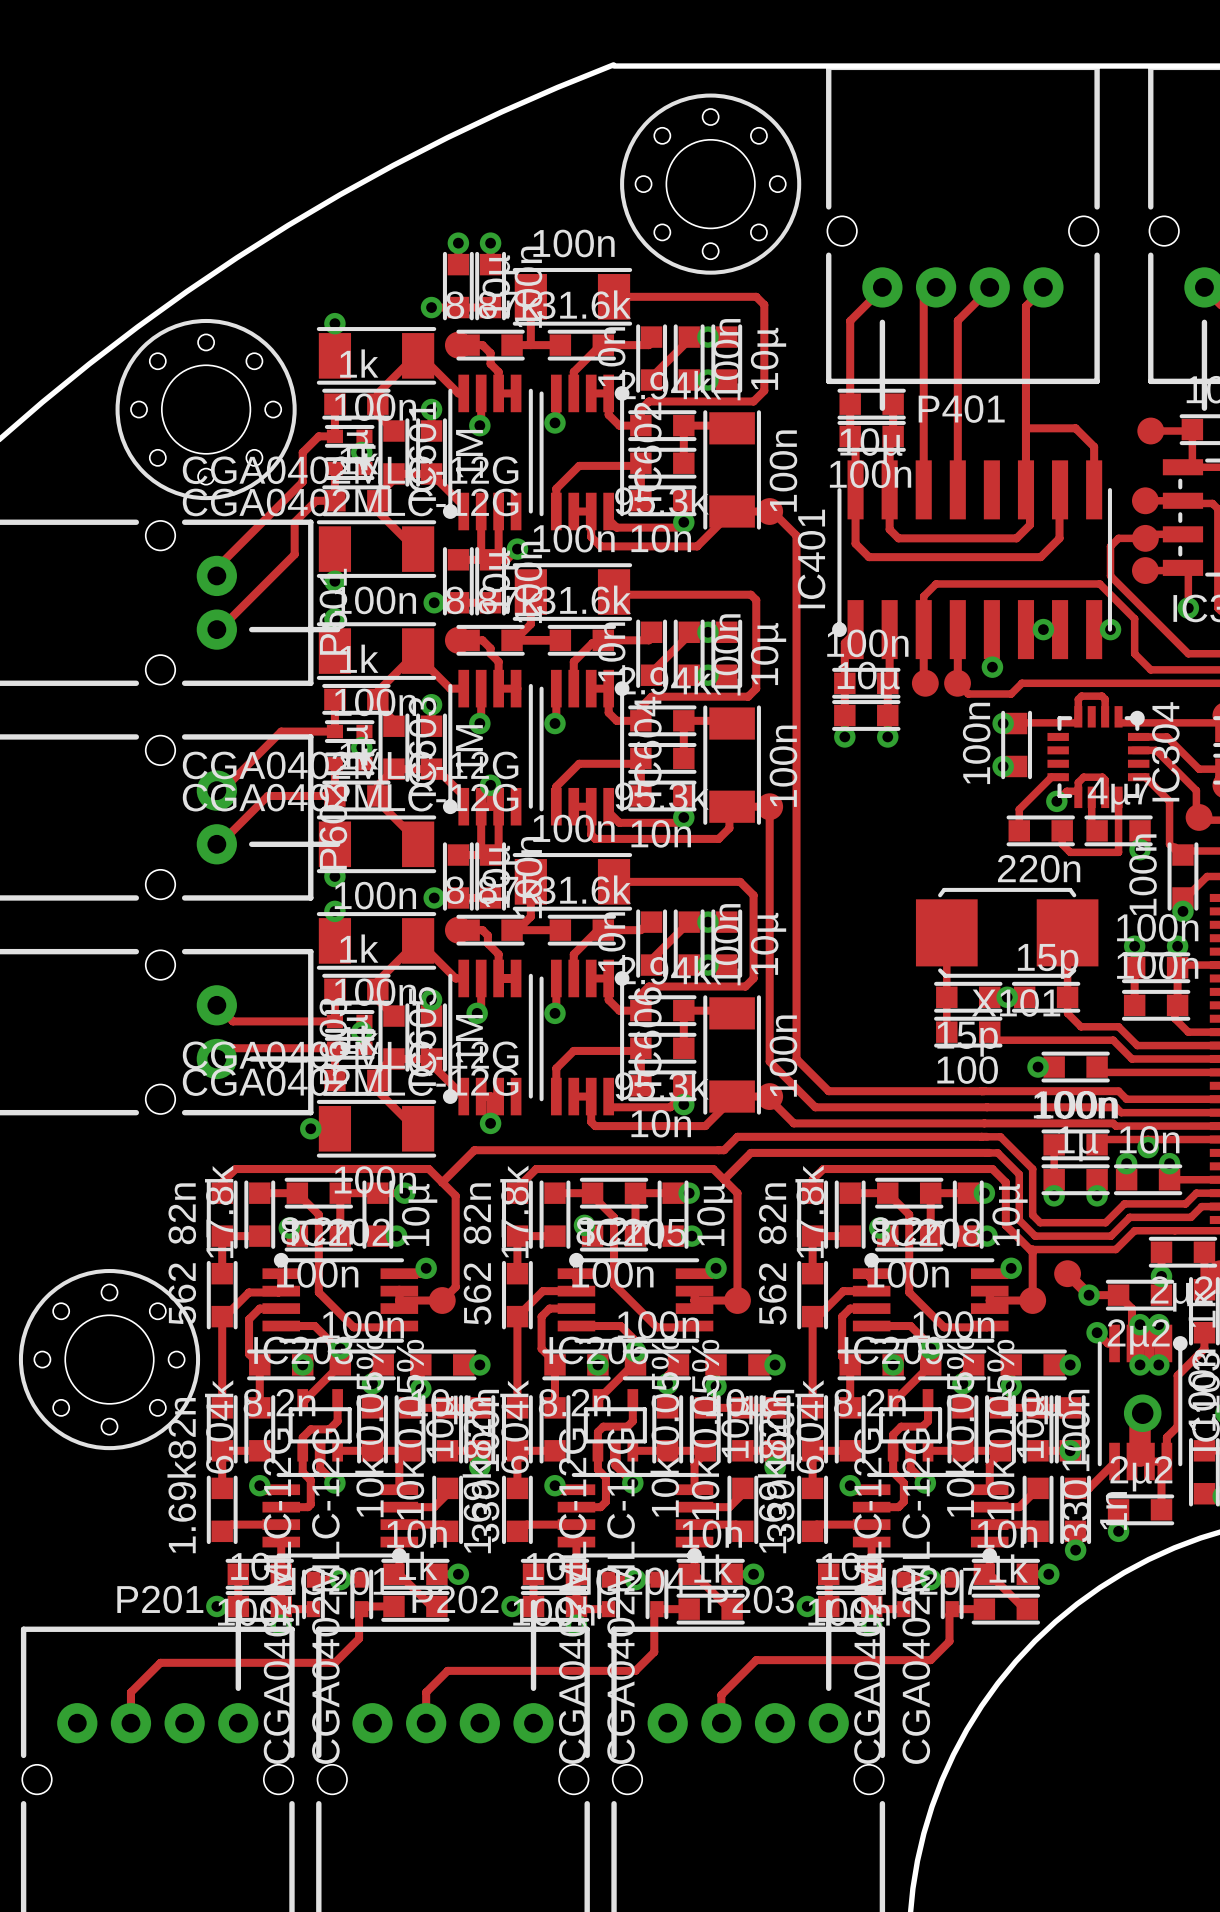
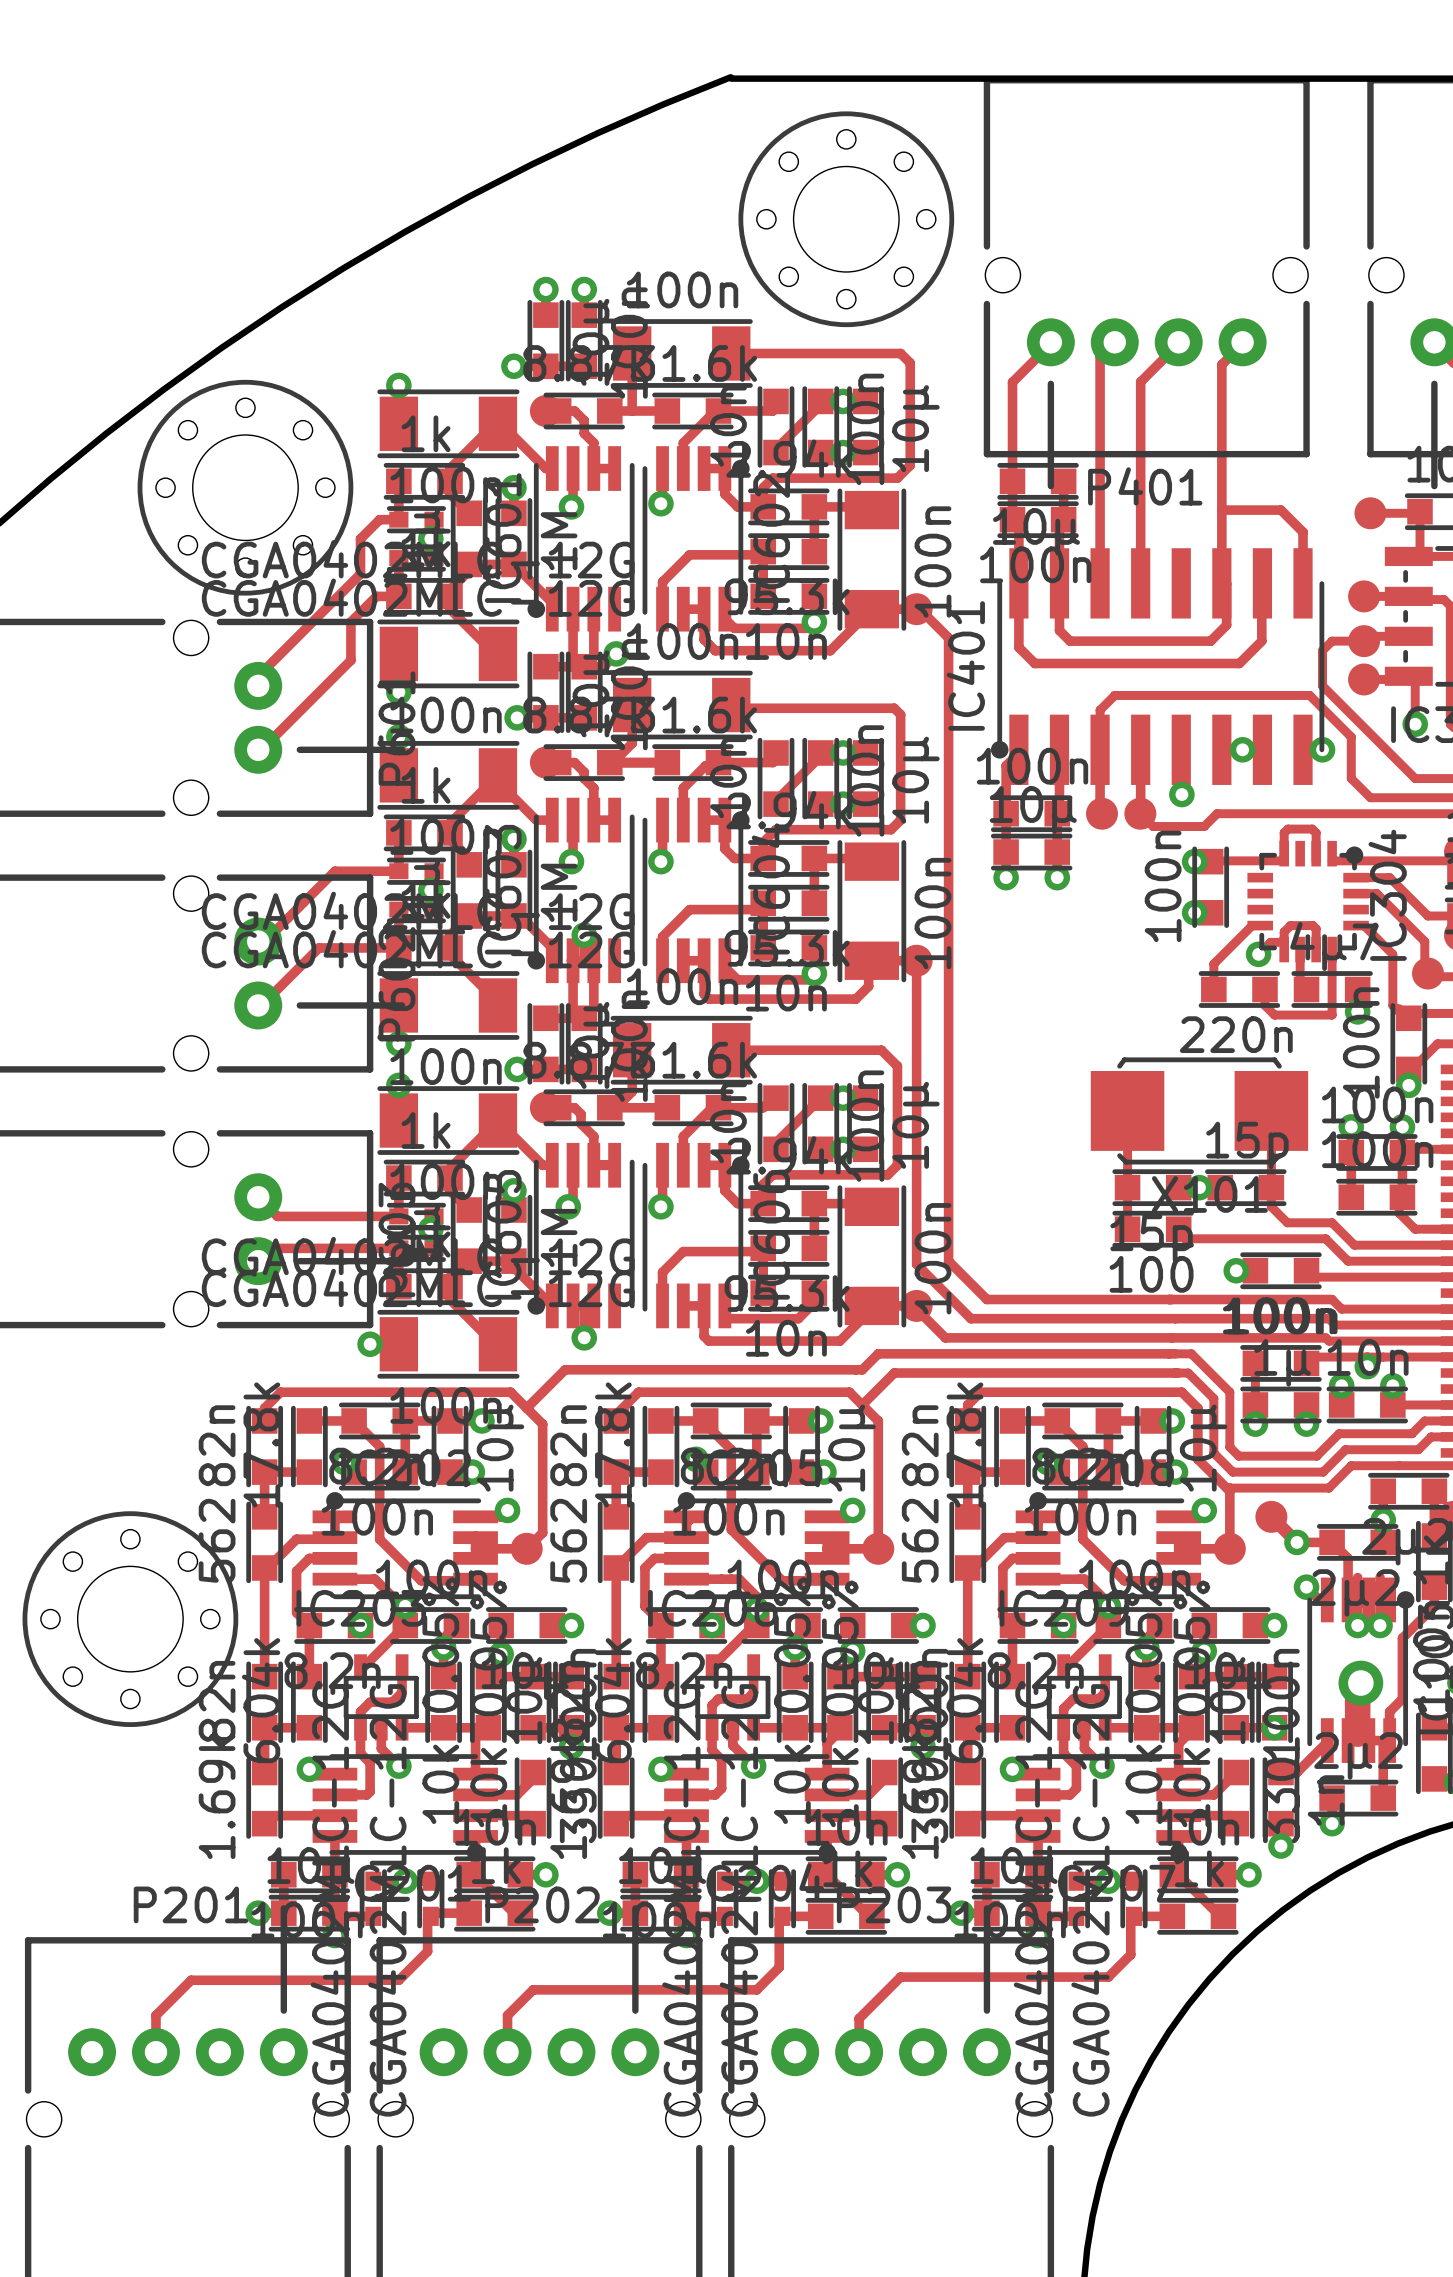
via: (683, 1104) -> none
via: (1140, 1324) -> none
via: (1158, 1324) -> none

